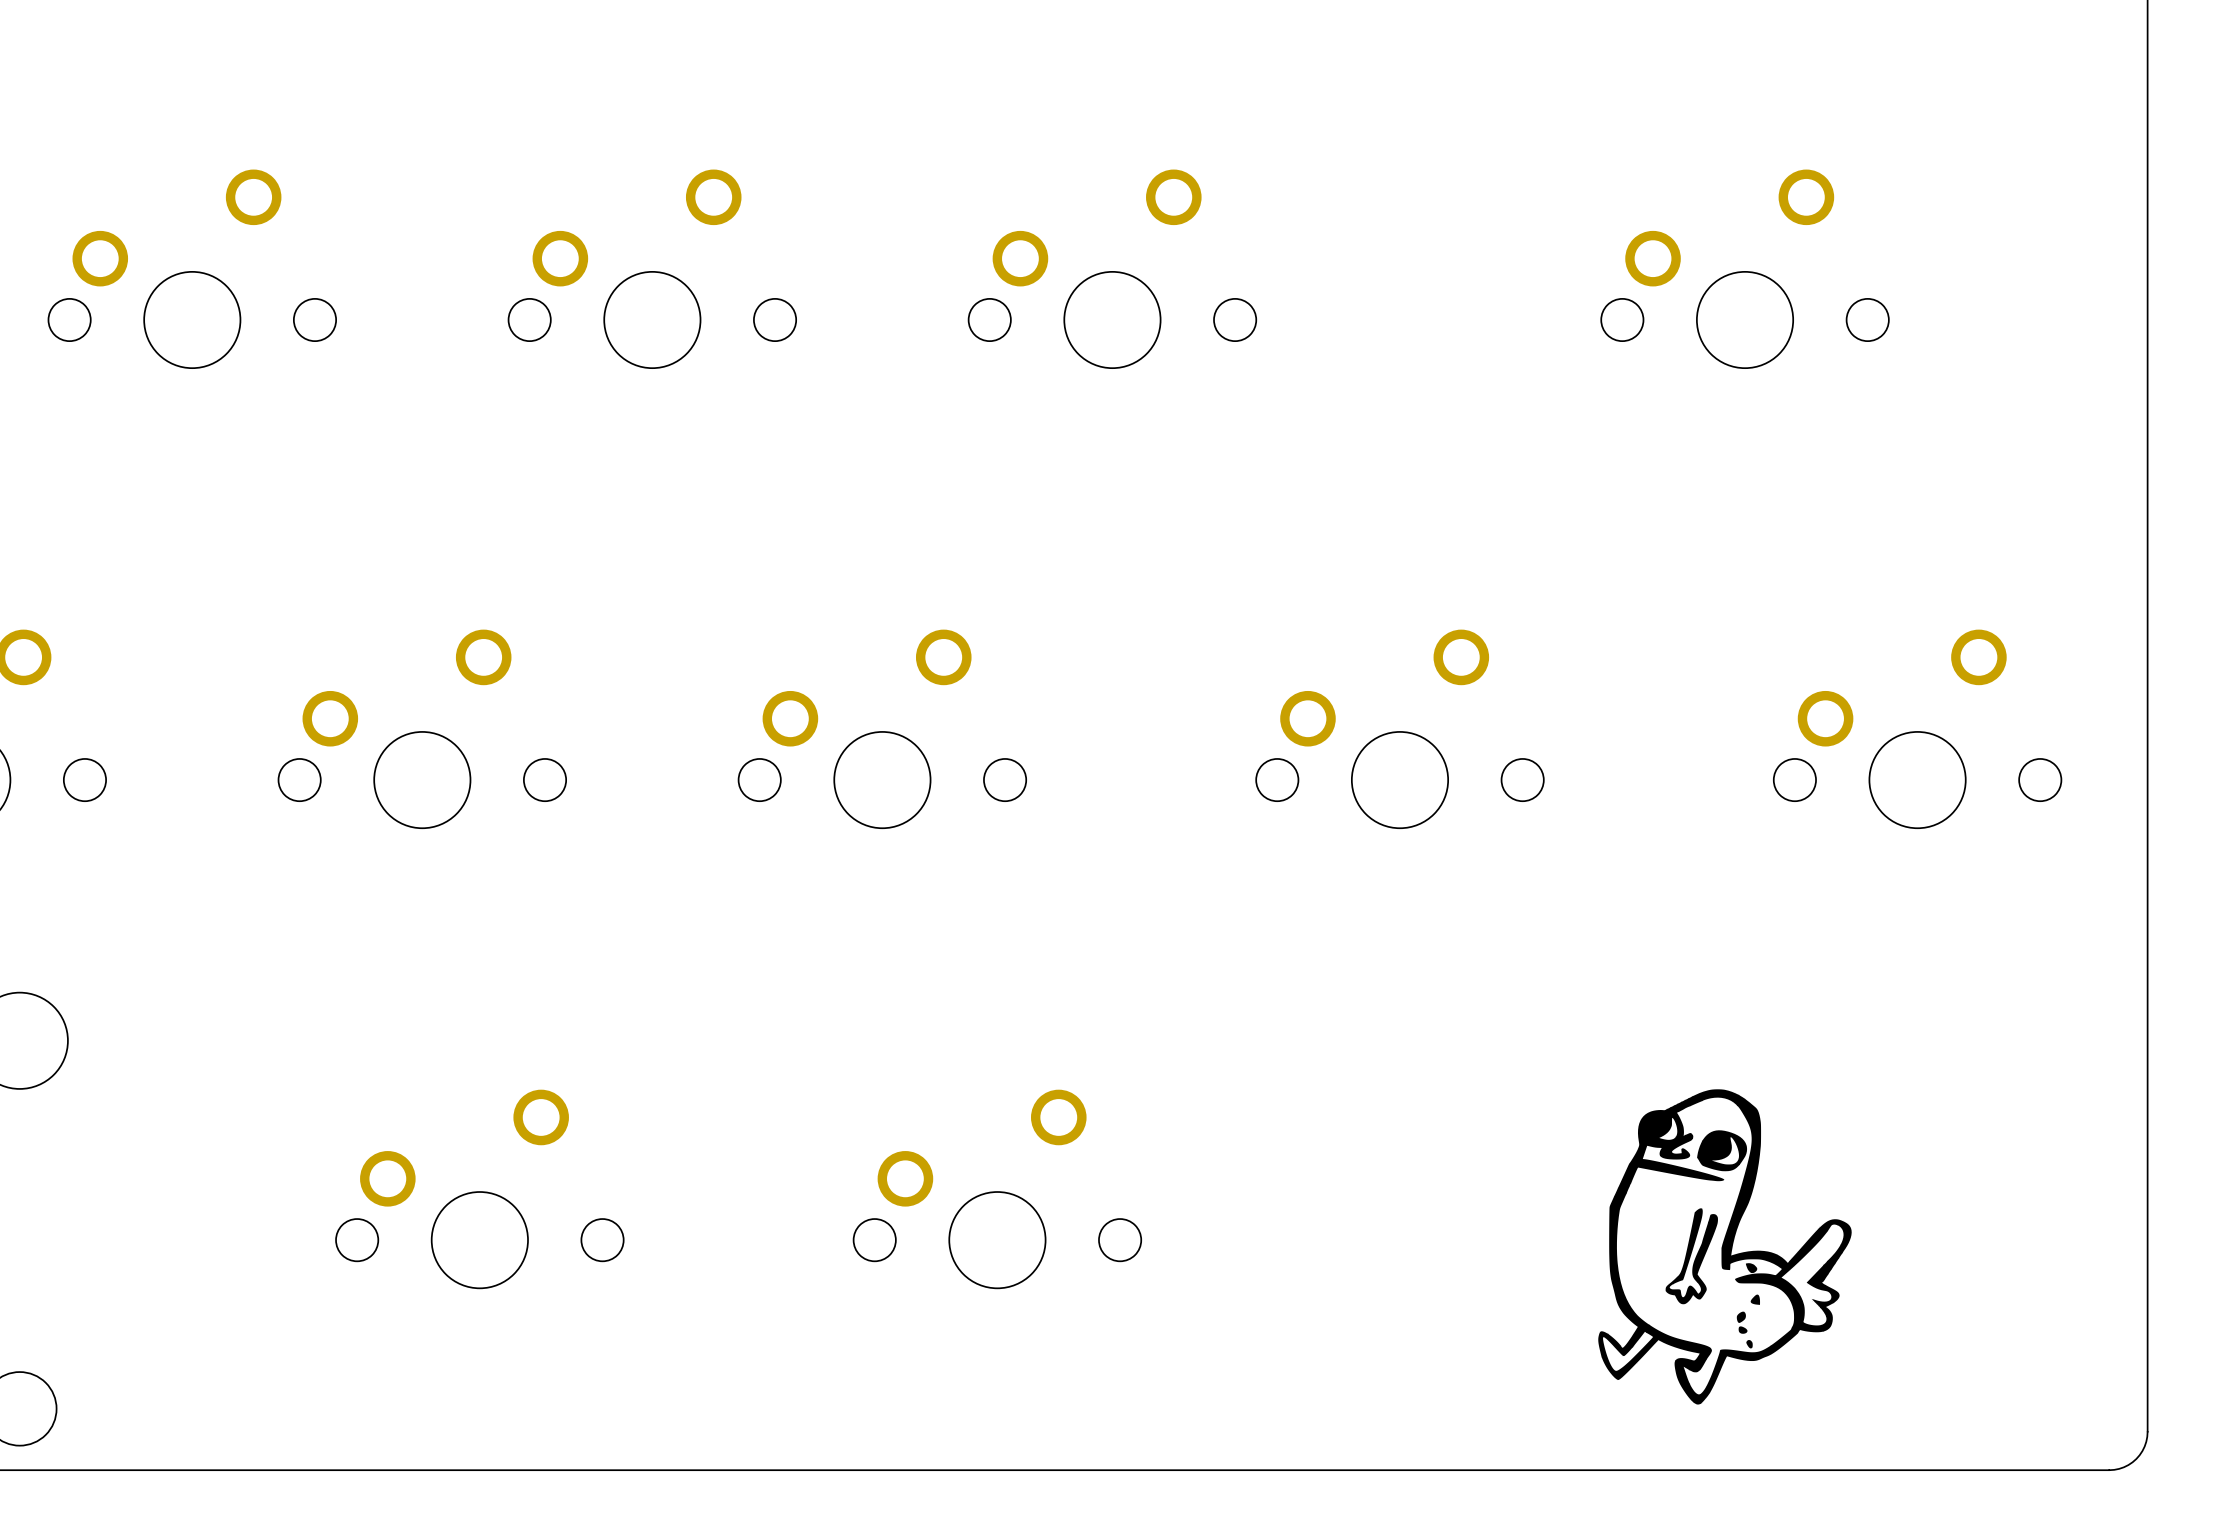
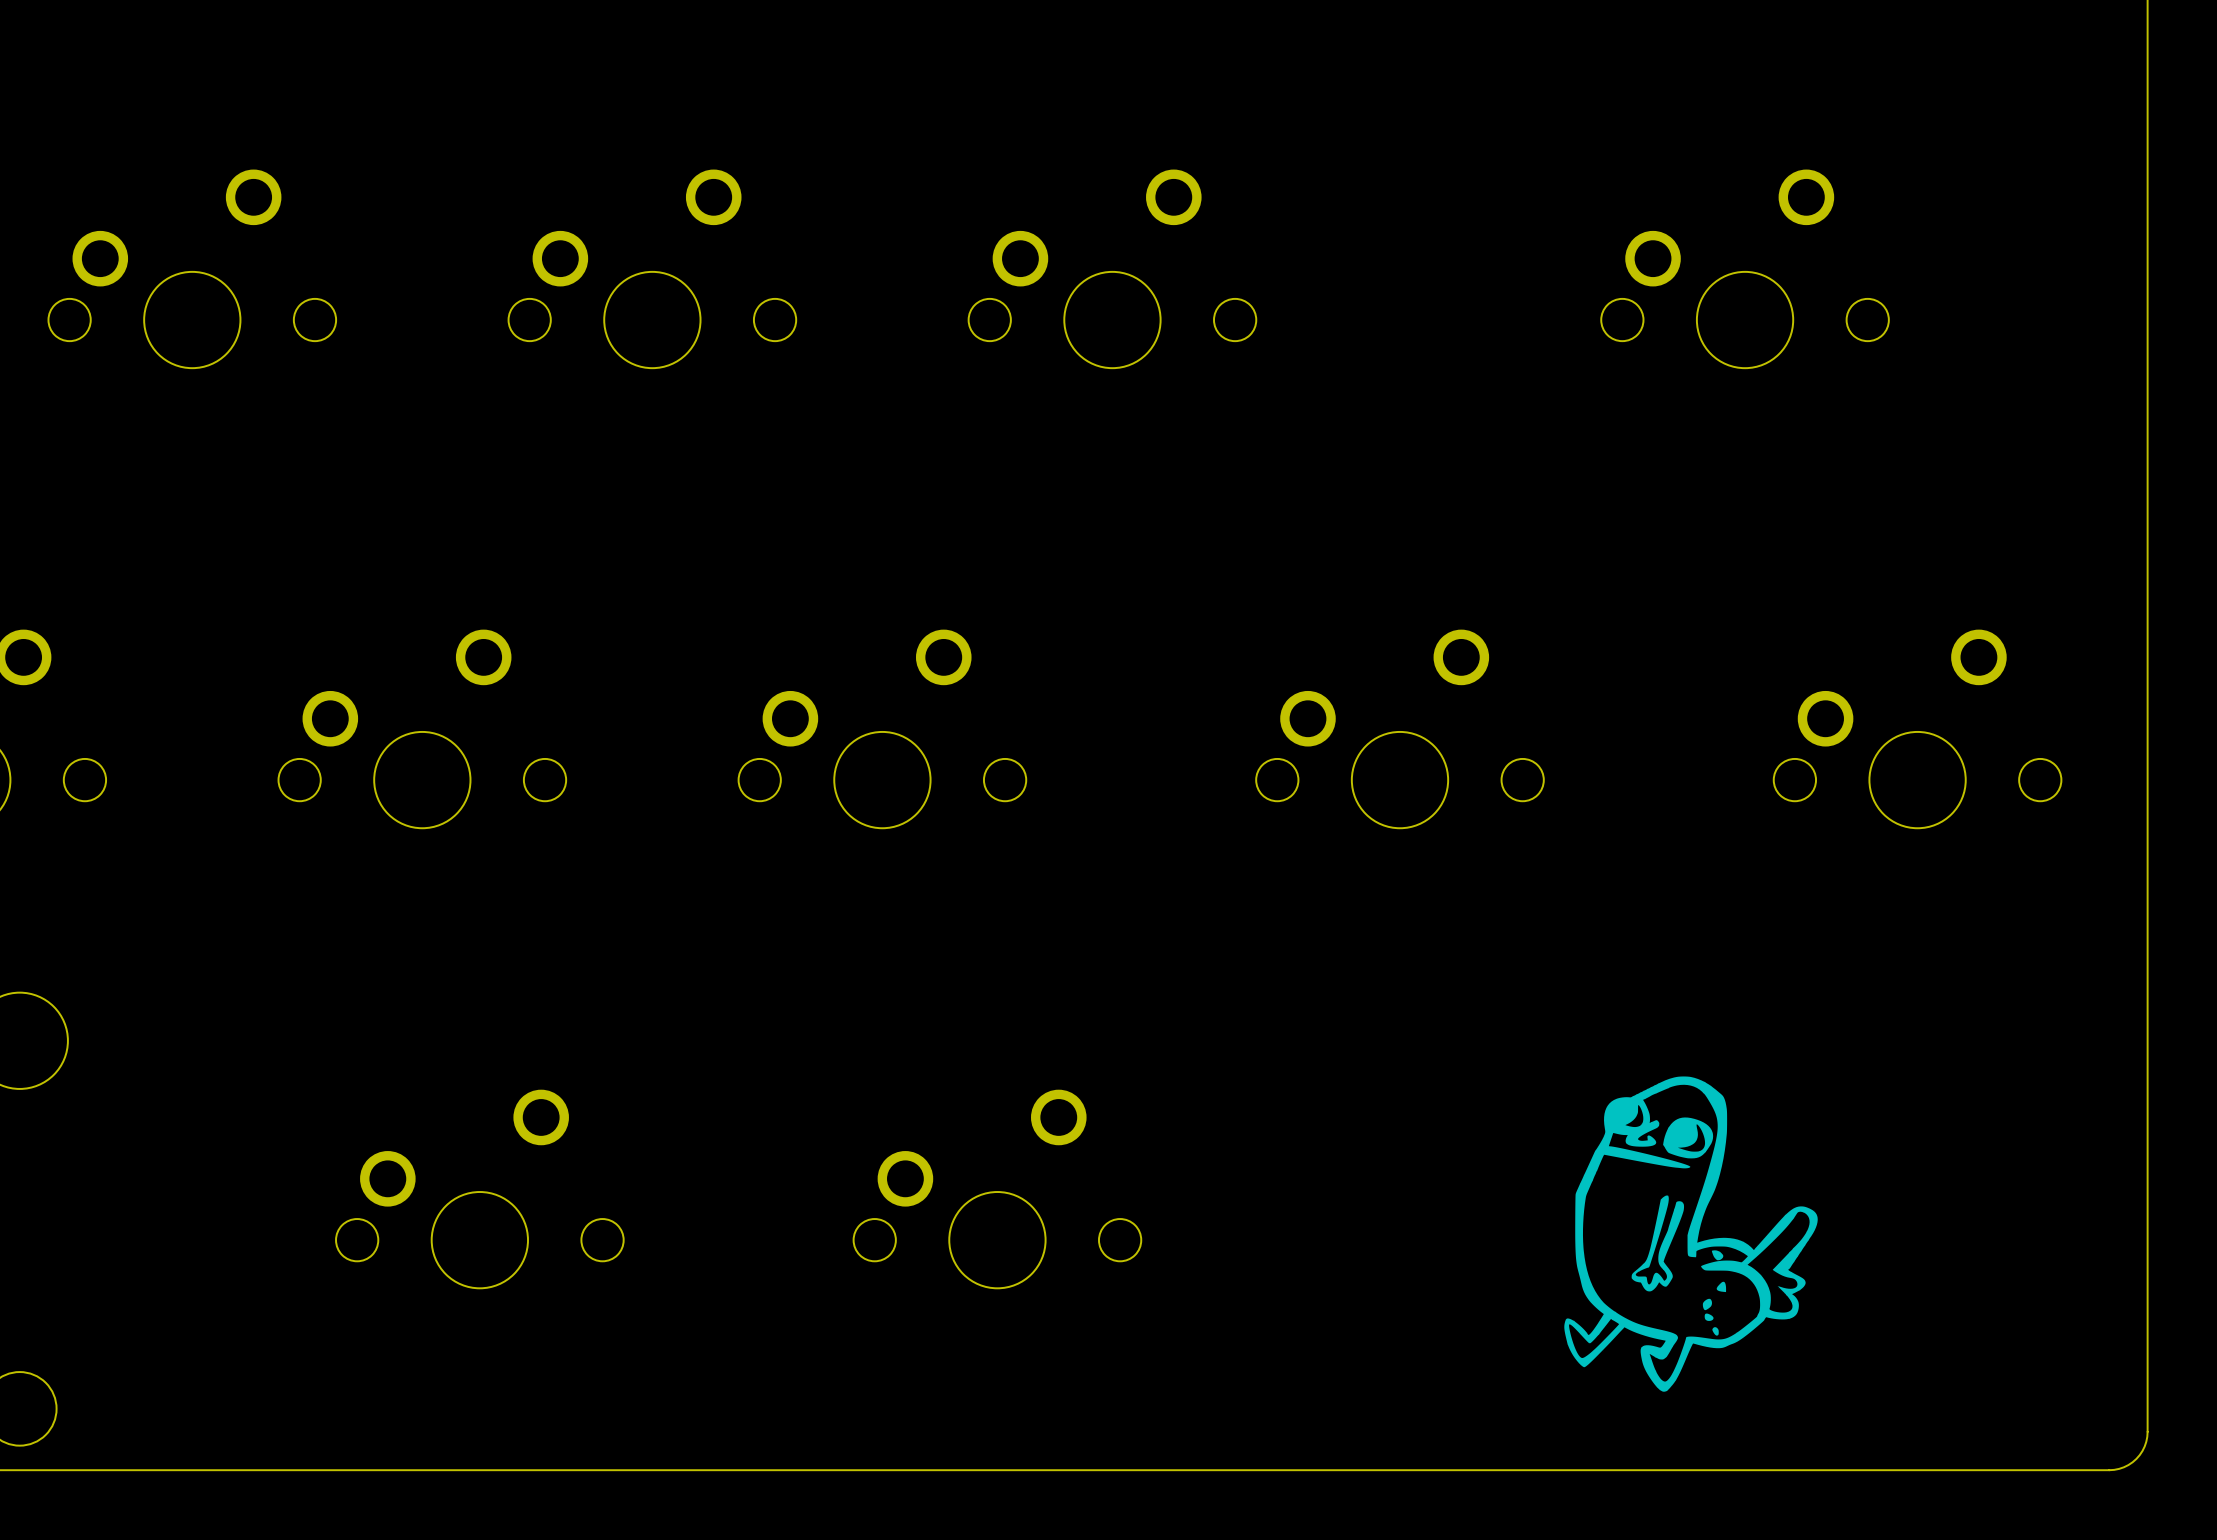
drawing position: (1724, 1246) -> (1691, 1234)

